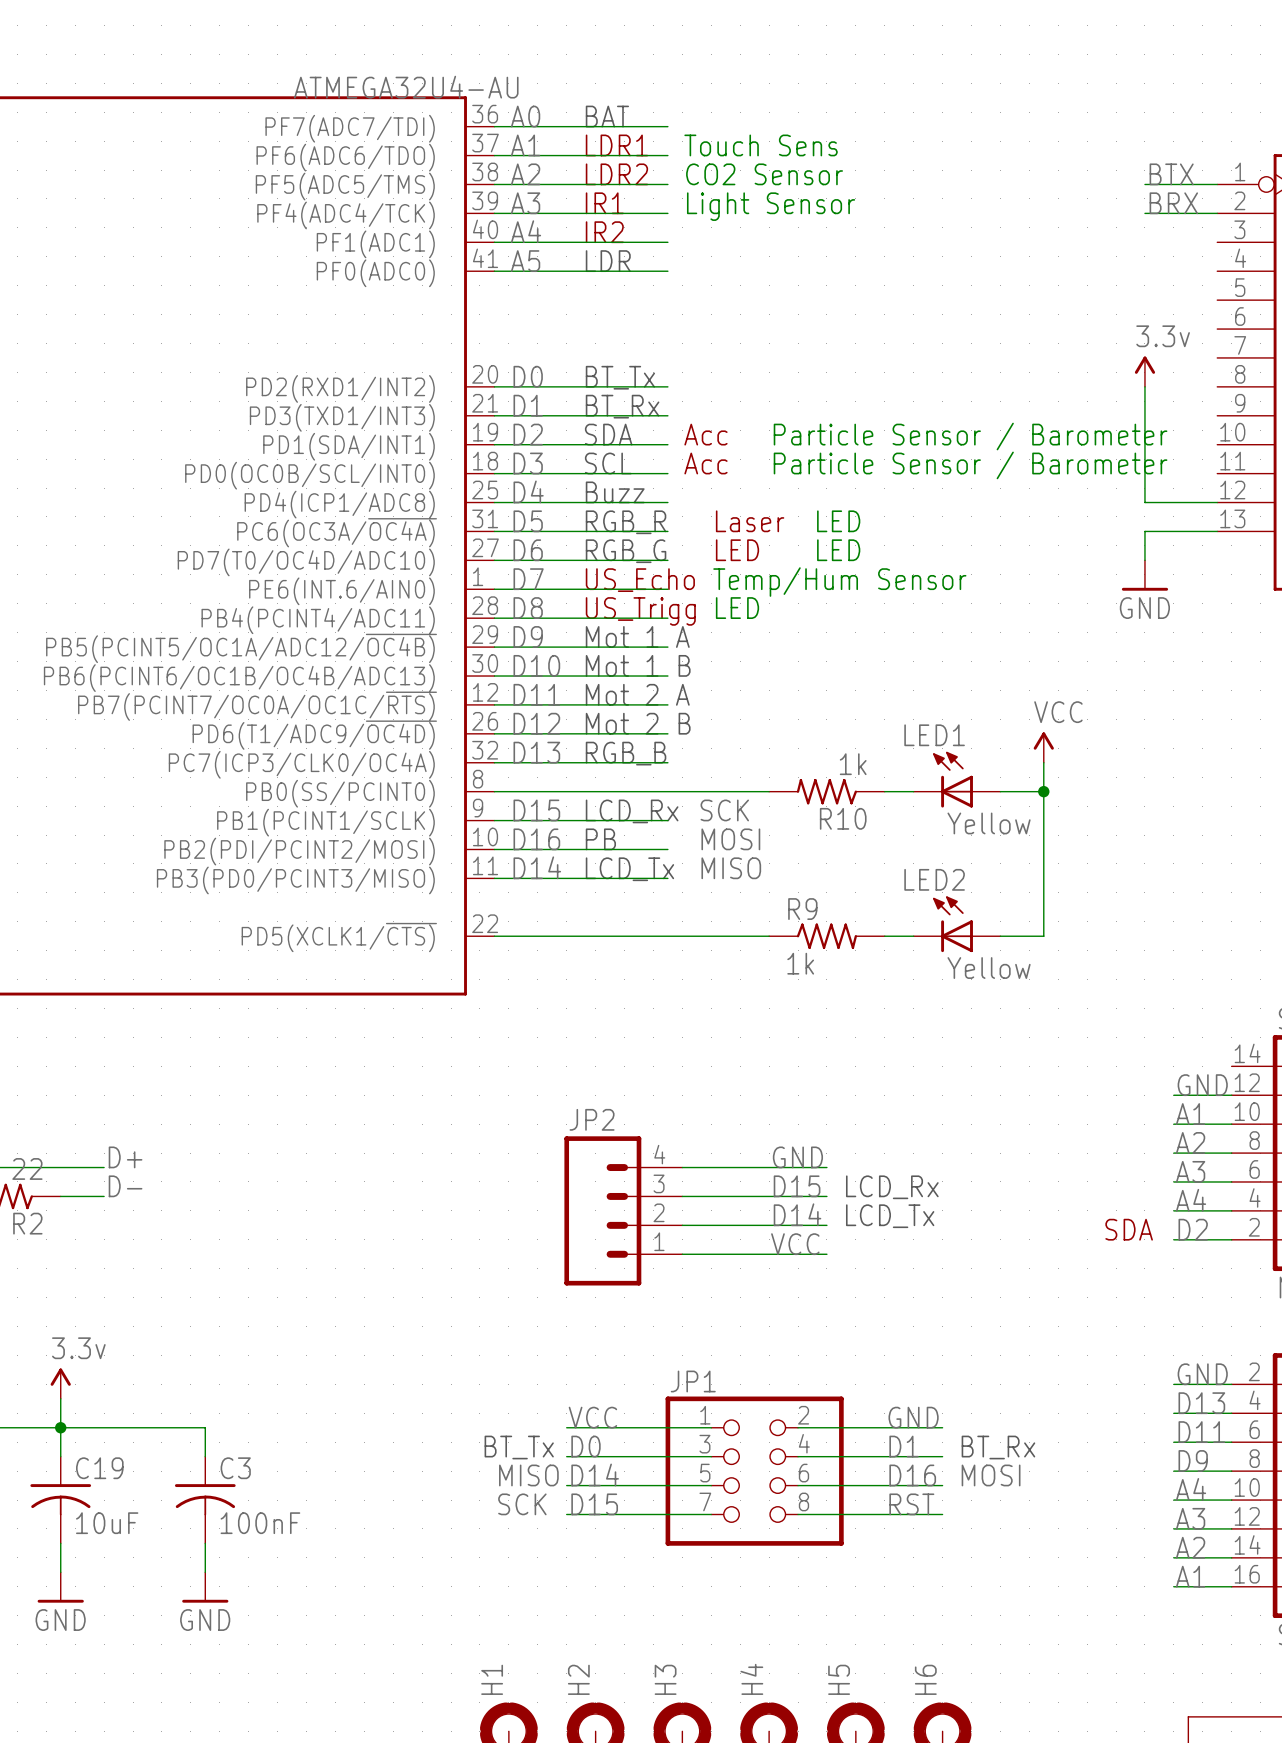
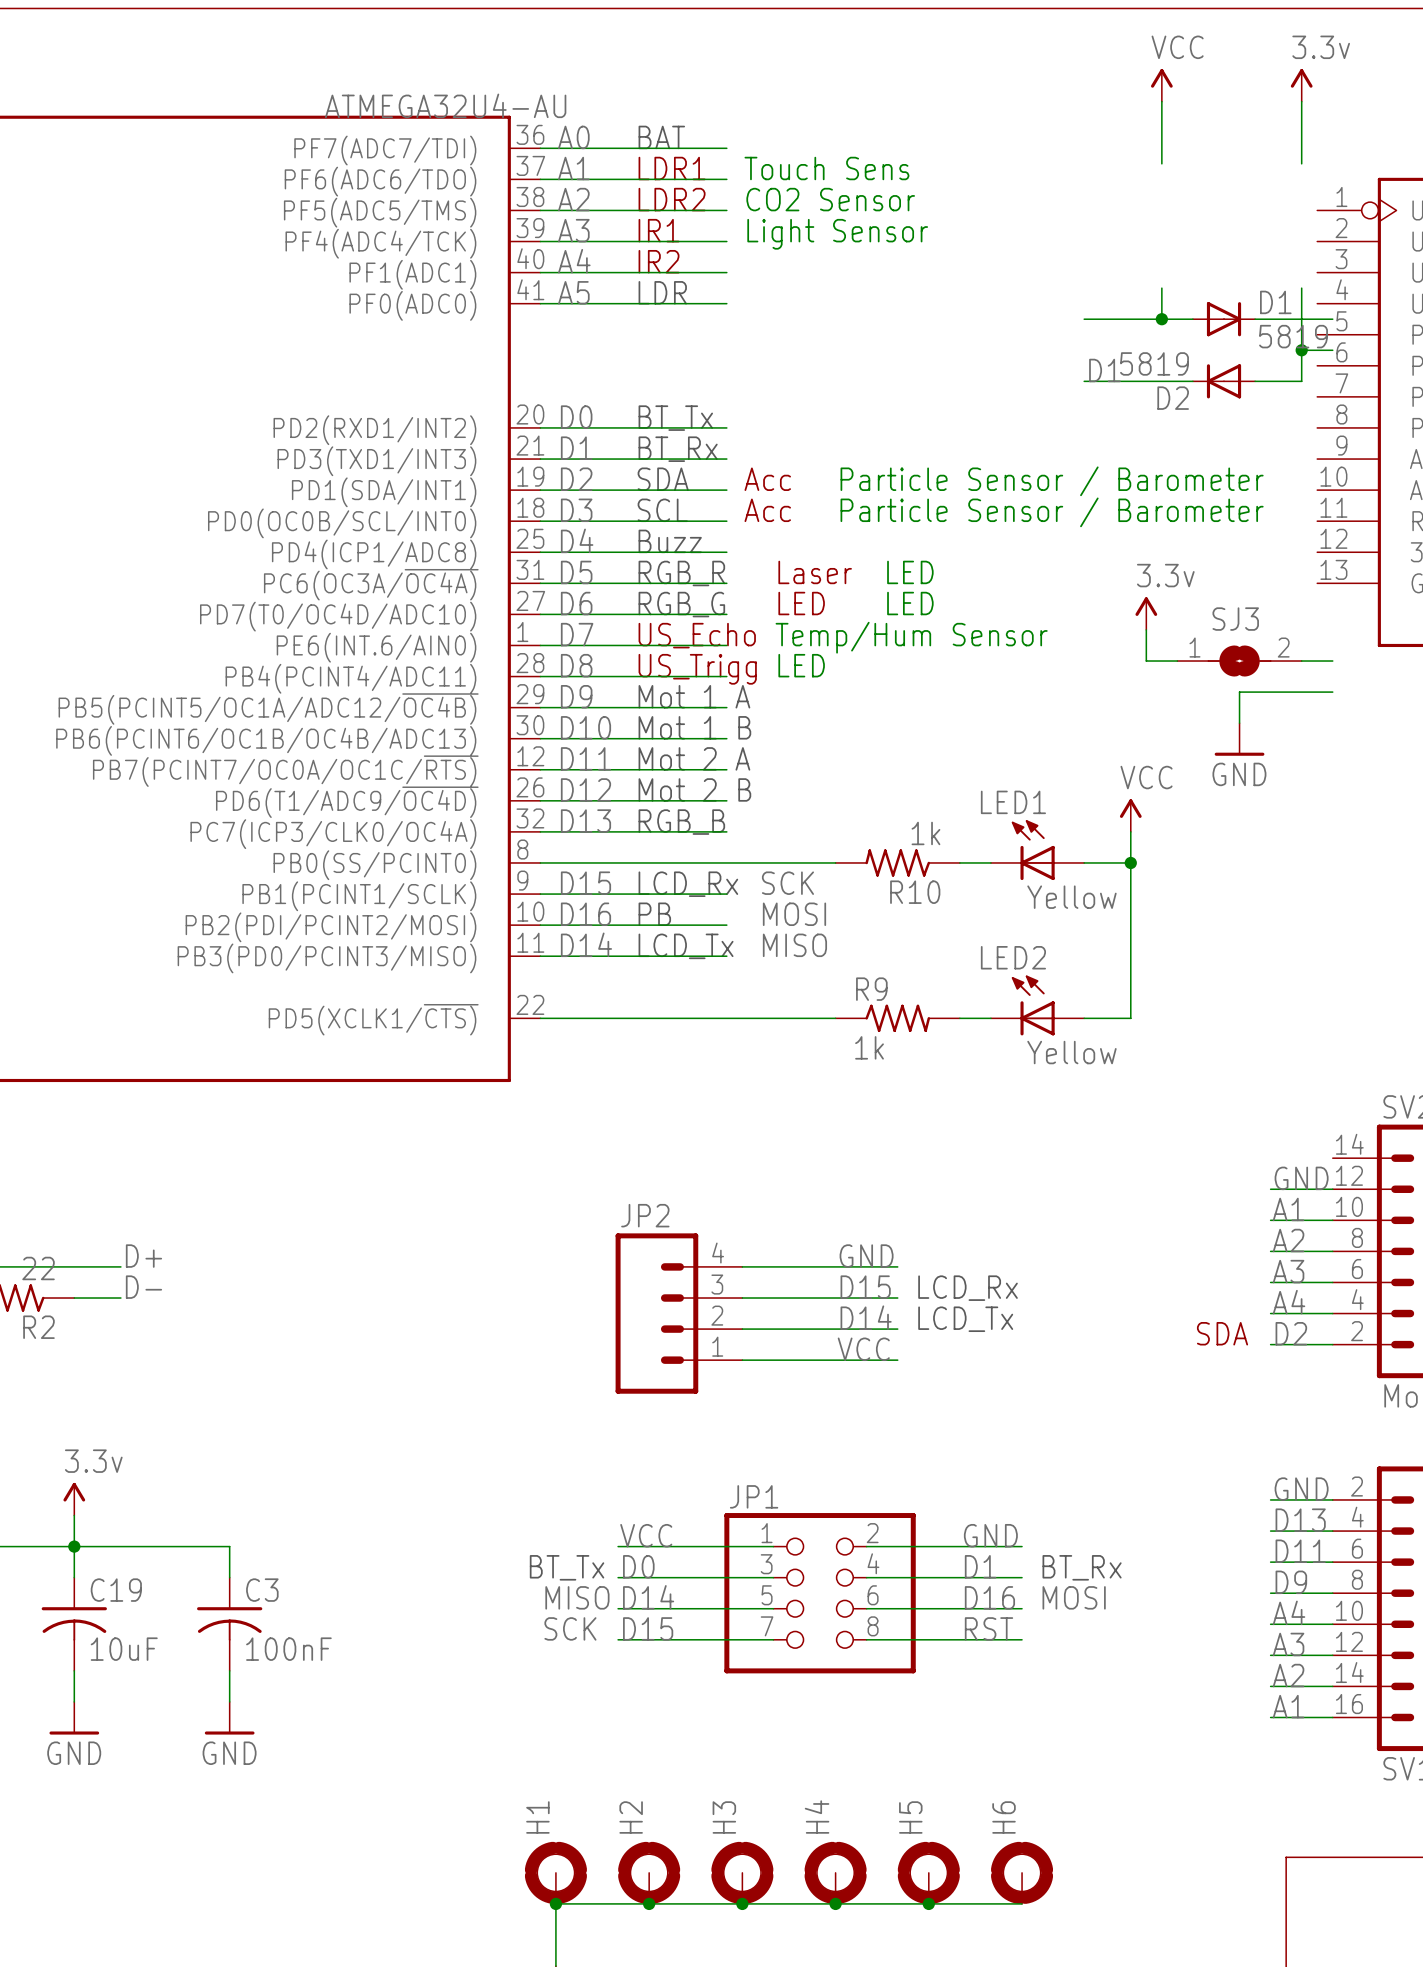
power symbol: none -> VCC (1161, 85)
power symbol: none -> 3.3v (1301, 85)
wire: none -> (1161, 101) (1161, 163)
wire: none -> (1301, 101) (1301, 163)
label: BTX (1171, 174) -> none
wire: (1144, 184) (1217, 184) -> (1255, 319) (1332, 319)
label: BRX (1173, 203) -> none
wire: (1144, 213) (1217, 213) -> none
wire: none -> (1161, 288) (1161, 319)
wire: none -> (1301, 288) (1301, 381) (1255, 381)
wire: none -> (1084, 319) (1192, 319)
junction: none -> (1161, 319)
D1: none -> 5819 (1224, 319)
wire: none -> (1301, 350) (1332, 350)
junction: none -> (1301, 350)
label: none -> D1 (1104, 370)
wire: none -> (1084, 381) (1192, 381)
D2: none -> 5819 (1224, 381)
power symbol: 3.3v (1144, 371) -> none
wire: (1144, 386) (1144, 502) (1217, 502) -> none
wire: (1217, 531) (1144, 531) (1144, 560) -> none
power symbol: none -> 3.3v (1146, 613)
wire: none -> (1146, 629) (1146, 661) (1177, 661)
power symbol position: GND (1144, 575) -> GND (1239, 739)
SJ3: none -> (1239, 661)
wire: none -> (1301, 661) (1332, 661)
wire: none -> (1332, 692) (1239, 692) (1239, 723)

